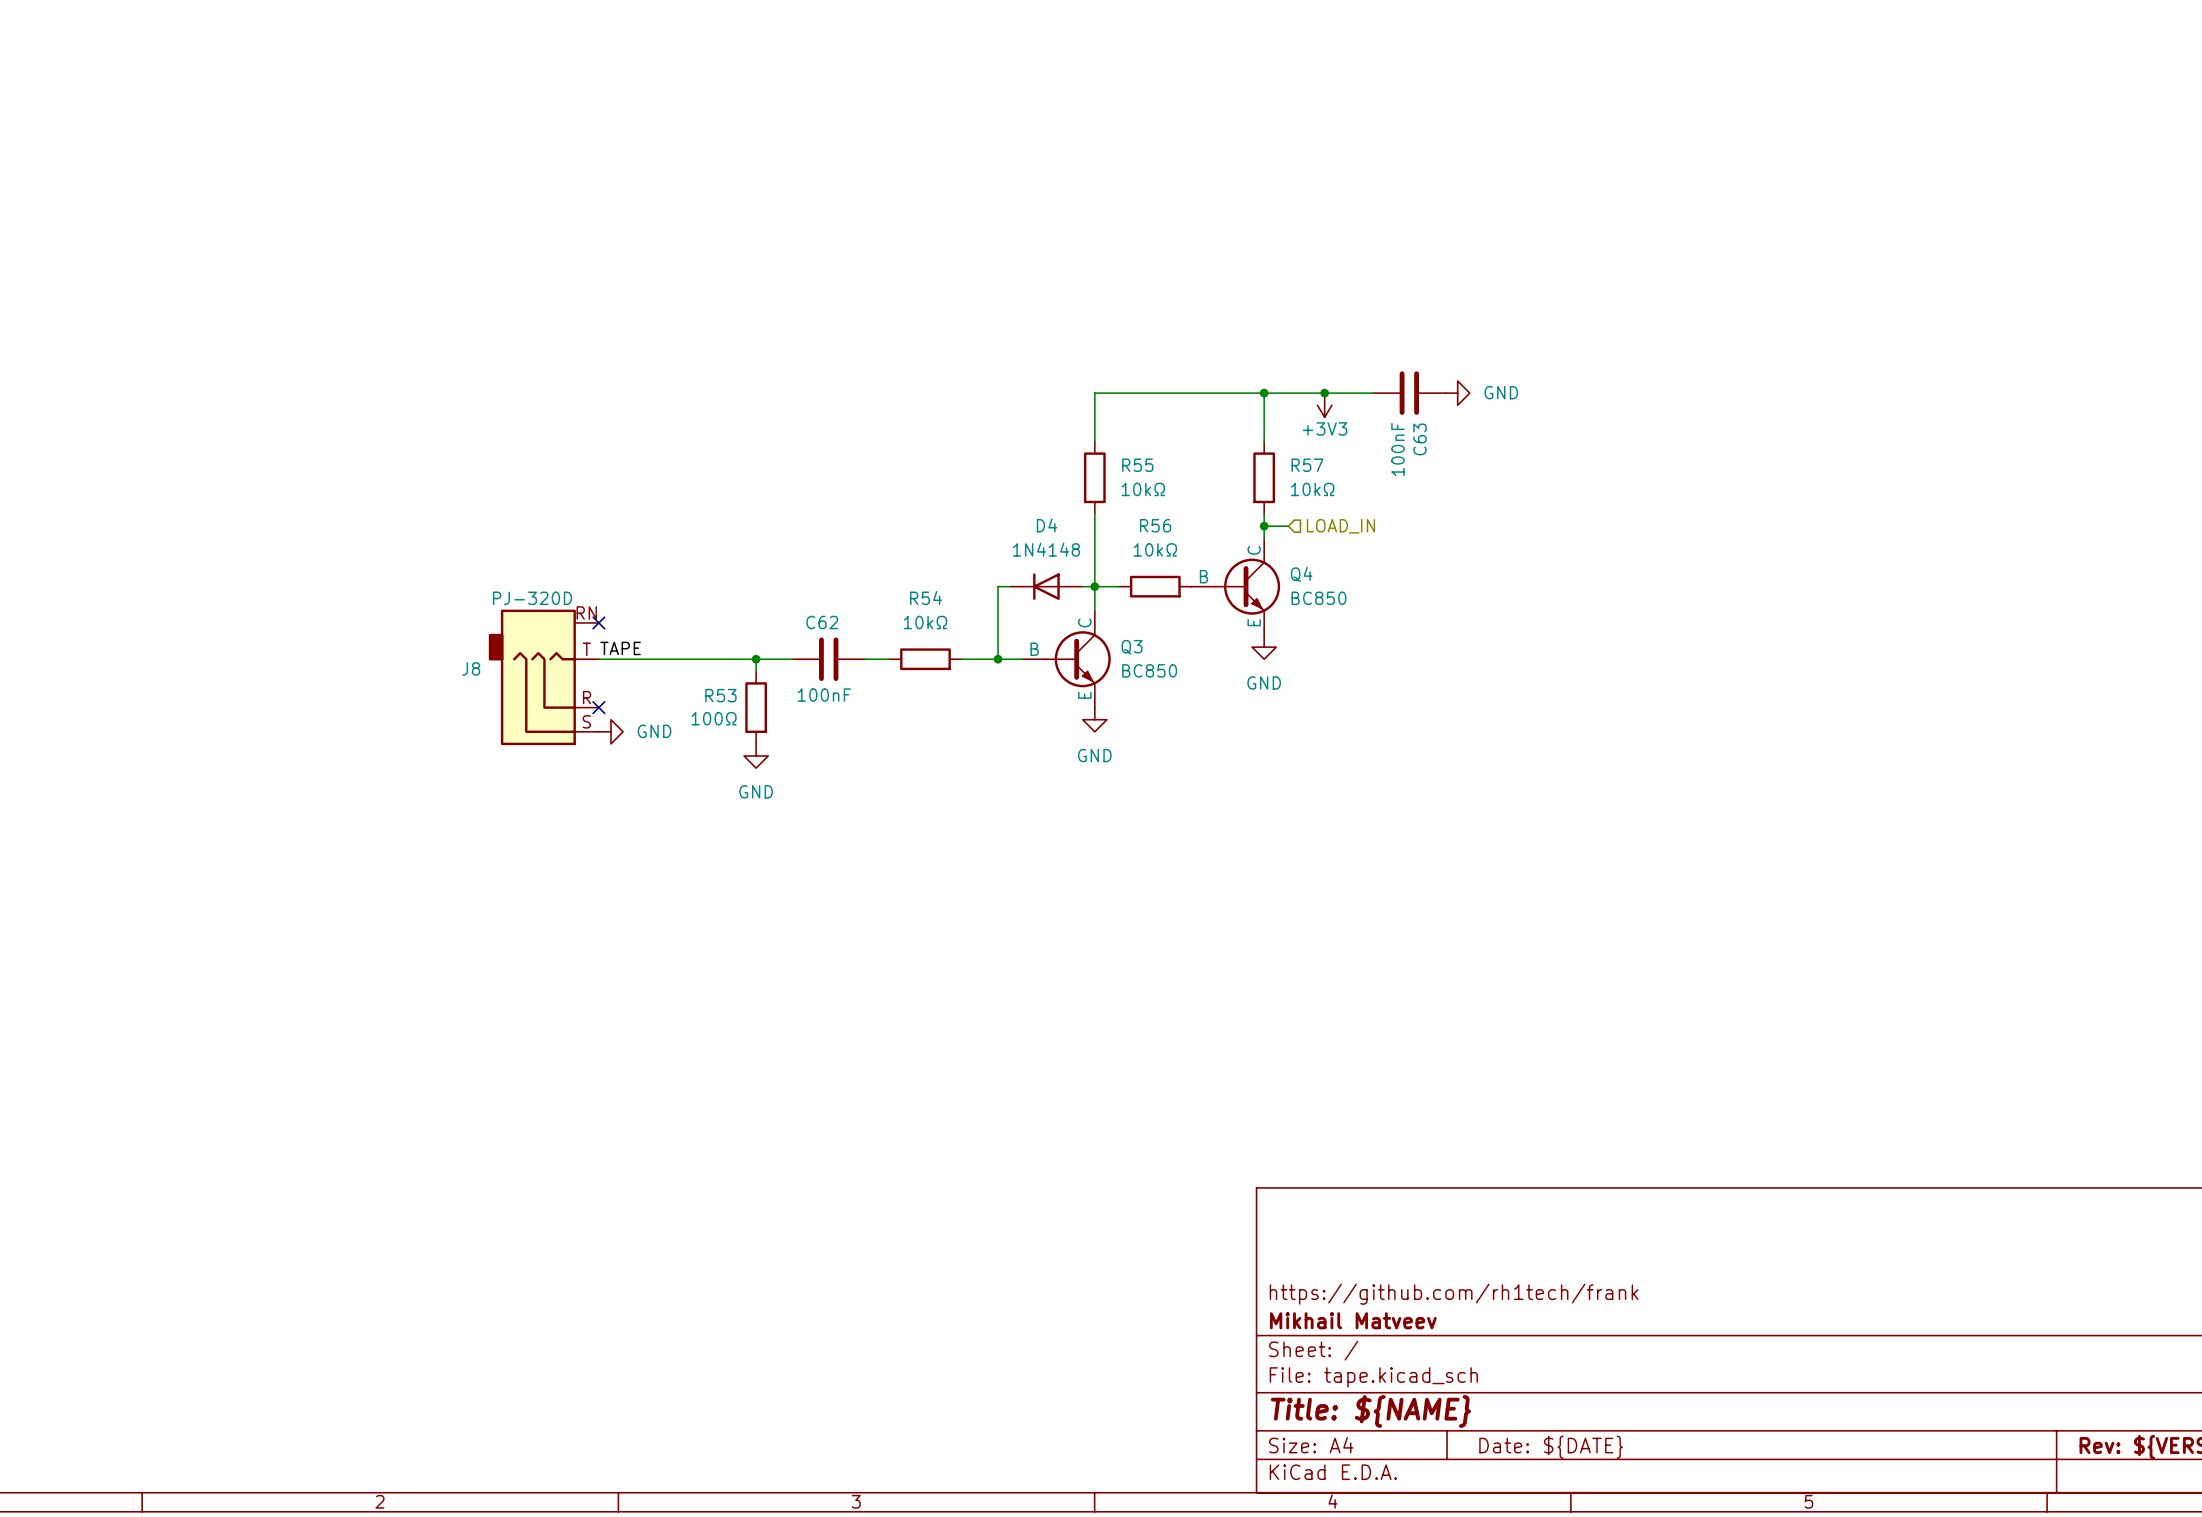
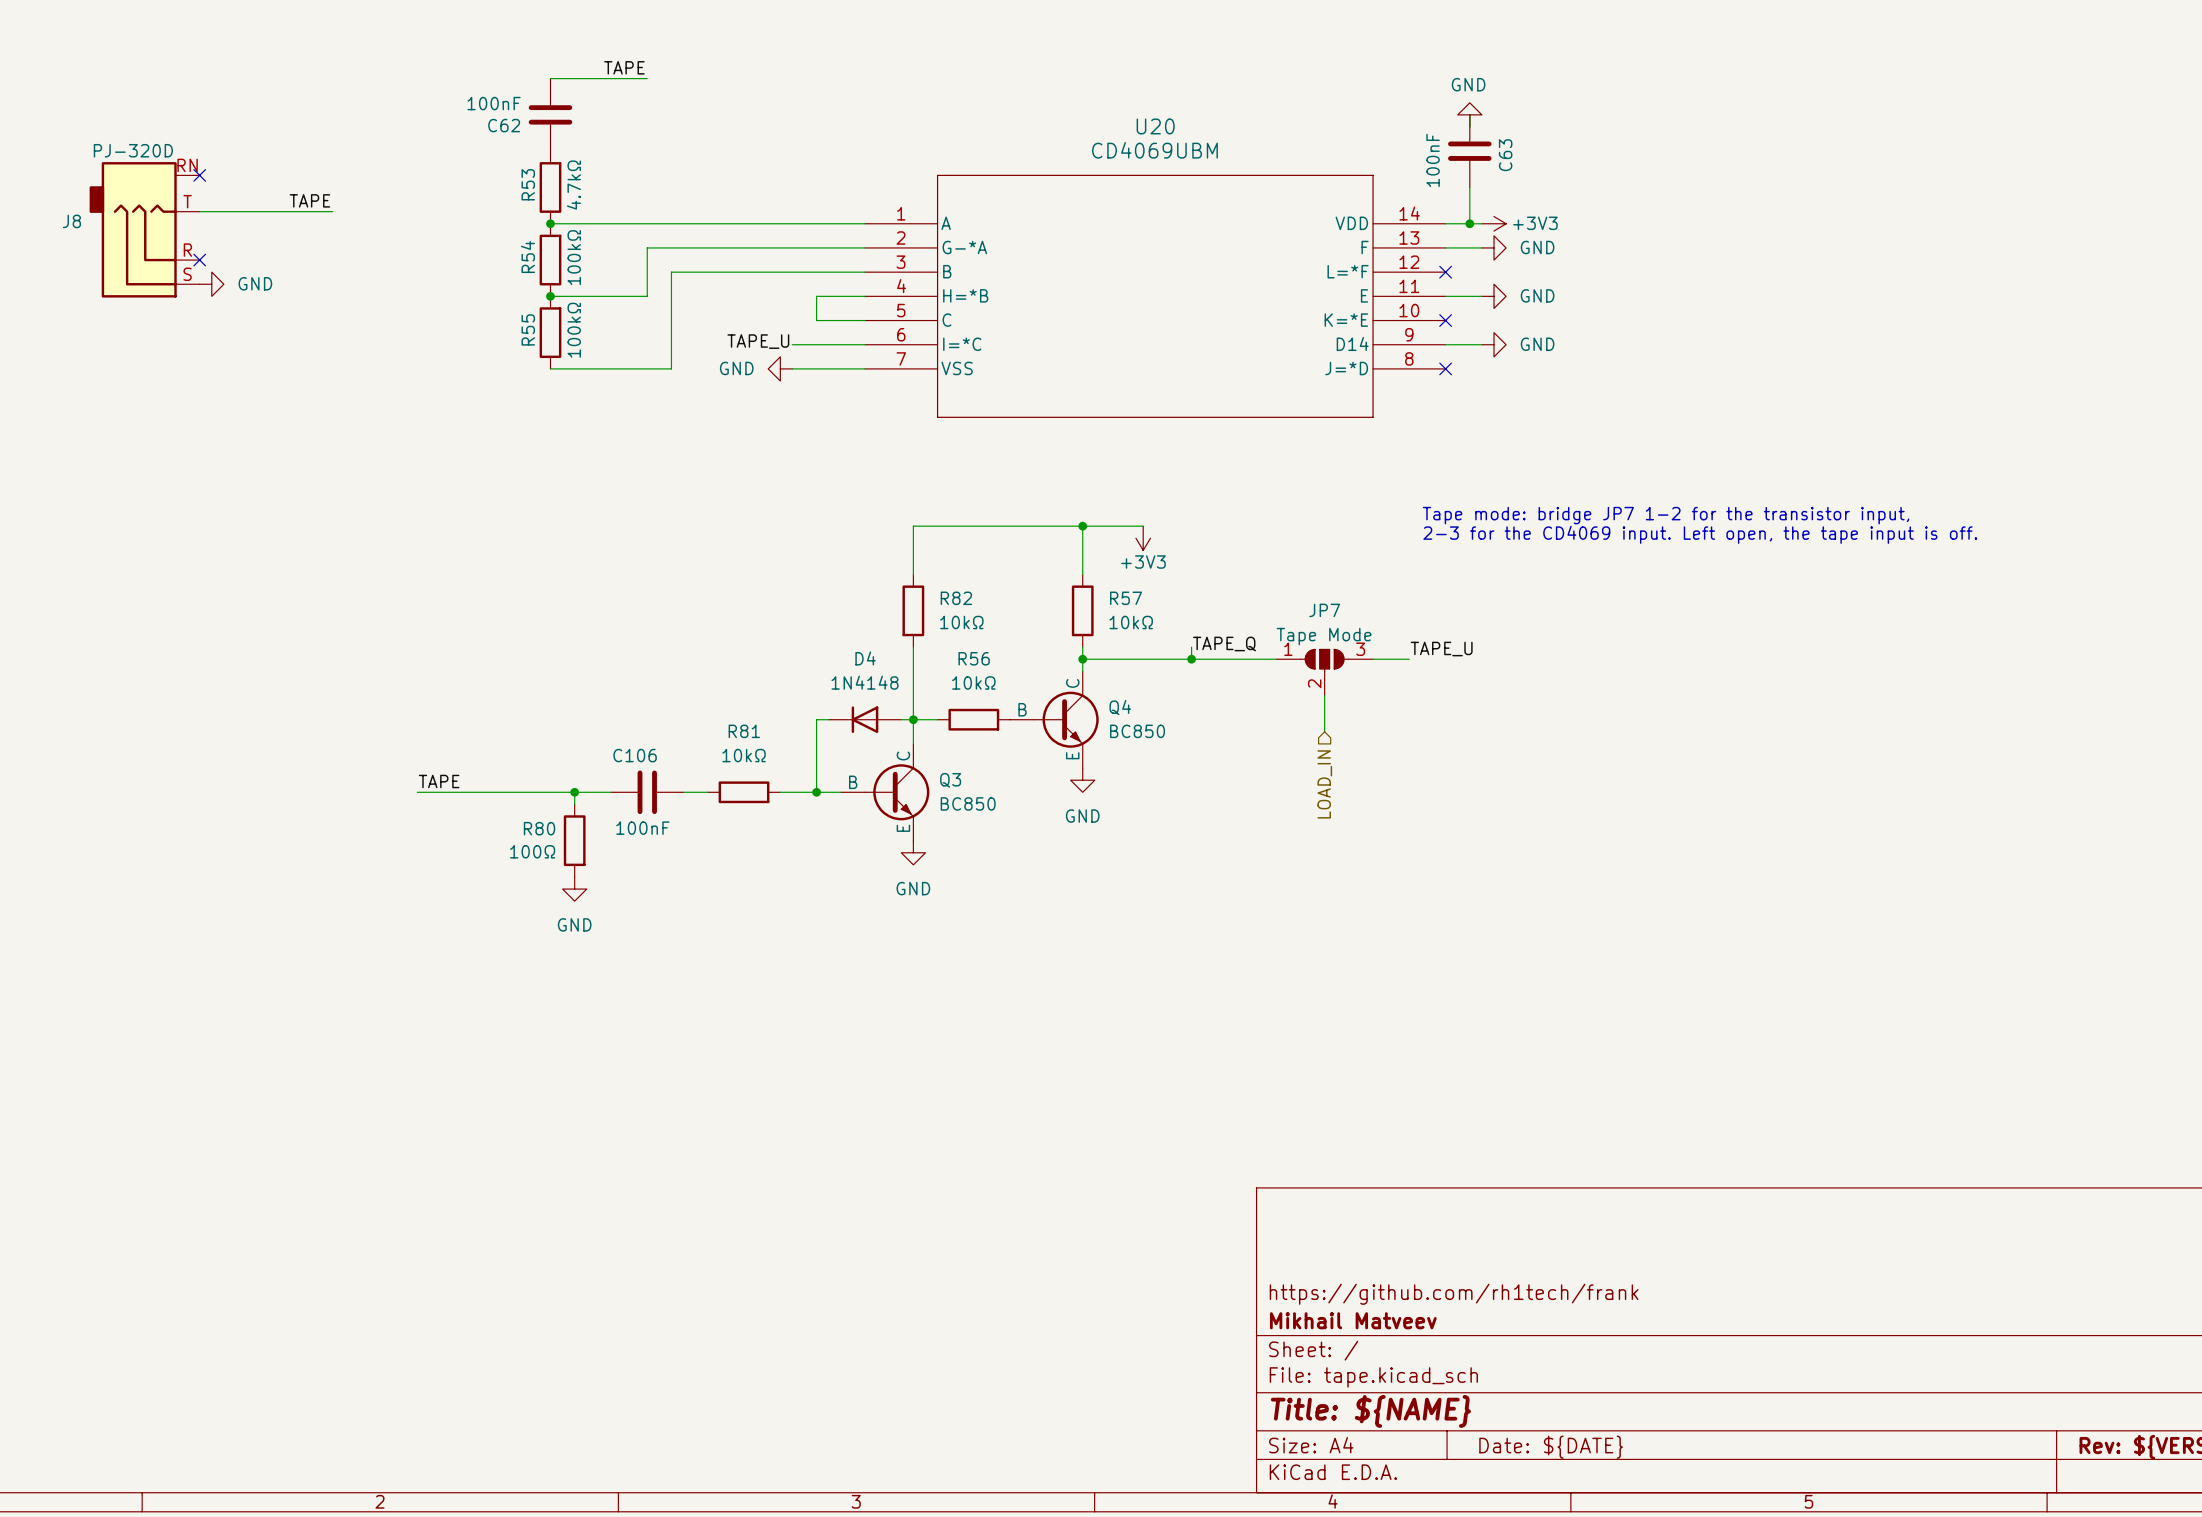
label: none -> TAPE (624, 67)
wire: none -> (550, 78) (647, 78)
wire: none -> (1469, 114) (1469, 127)
power symbol: none -> GND (1469, 114)
no-connect mark: none -> (199, 175)
wire: none -> (1469, 187) (1469, 223)
label: none -> TAPE (309, 200)
wire: none -> (199, 211) (332, 211)
wire: none -> (550, 223) (864, 223)
junction: none -> (550, 223)
wire: none -> (1445, 223) (1481, 223)
junction: none -> (1469, 223)
power symbol: none -> +3V3 (1494, 223)
wire: none -> (864, 247) (647, 247) (647, 296) (550, 296)
wire: none -> (1445, 247) (1481, 247)
power symbol: none -> GND (1494, 247)
no-connect mark: none -> (199, 260)
wire: none -> (864, 272) (671, 272) (671, 368) (550, 368)
no-connect mark: none -> (1445, 272)
power symbol: none -> GND (211, 284)
junction: none -> (550, 296)
wire: none -> (864, 296) (816, 296) (816, 320) (864, 320)
U20: none -> CD4069UBM (1155, 296)
wire: none -> (1445, 296) (1481, 296)
power symbol: none -> GND (1494, 296)
no-connect mark: none -> (1445, 320)
label: none -> TAPE_U (758, 341)
wire: none -> (792, 344) (864, 344)
wire: none -> (1445, 344) (1481, 344)
power symbol: none -> GND (1494, 344)
power symbol: none -> GND (780, 368)
wire: none -> (792, 368) (864, 368)
no-connect mark: none -> (1445, 368)
wire: (1264, 393) (1264, 441) -> (1082, 526) (1082, 574)
junction: (1264, 393) -> none
junction: (1324, 393) -> none
wire: (1373, 393) (1094, 393) (1094, 441) -> none
C63 rotation: 0° (1409, 393) -> 90° clockwise (1469, 151)
C63 position: (1409, 393) -> (1469, 151)
power symbol: GND (1457, 393) -> none
power symbol: +3V3 (1324, 405) -> none
C63 name position: C63 (1420, 439) -> C63 (1505, 155)
C63 value position: 100nF (1397, 449) -> 100nF (1433, 160)
R55 name rotation: 0° (1137, 465) -> 90° counterclockwise (528, 329)
R55 name position: R55 (1137, 465) -> R55 (528, 329)
R55 position: (1094, 477) -> (550, 332)
R57 position: (1264, 477) -> (1082, 610)
R55 value: 10kΩ (1143, 489) -> 100kΩ (574, 330)
wire: (1094, 514) (1094, 610) -> (913, 647) (913, 743)
wire: (1264, 514) (1264, 538) -> (1082, 647) (1082, 671)
text: none -> Tape mode: bridge JP7 1-2 for the transistor input, (1666, 515)
junction: none -> (1082, 526)
wire: none -> (1143, 526) (913, 526) (913, 574)
wire: (1264, 526) (1288, 526) -> none
junction: (1264, 526) -> none
hierarchical label rotation: 0° (1340, 526) -> 90° clockwise (1324, 784)
hierarchical label position: LOAD_IN (1340, 526) -> LOAD_IN (1324, 784)
text: none -> 2-3 for the CD4069 input. Left open, the tape input is off. (1700, 534)
power symbol: none -> +3V3 (1143, 538)
wire: (1010, 586) (998, 586) (998, 659) -> (828, 719) (816, 719) (816, 792)
D4 position: (1046, 586) -> (864, 719)
wire: (1082, 586) (1119, 586) -> (901, 719) (937, 719)
junction: (1094, 586) -> none
R56 position: (1155, 586) -> (973, 719)
Q4 position: (1235, 586) -> (1054, 719)
R54 name position: R54 (926, 598) -> R54 (527, 257)
R82: none -> 10kΩ (913, 610)
no-connect mark: (598, 622) -> none
C62 name position: C62 (822, 622) -> C62 (504, 125)
R54 value: 10kΩ (925, 622) -> 100kΩ (574, 257)
label: none -> TAPE_Q (1224, 644)
wire: none -> (1191, 647) (1191, 659)
power symbol: GND (1264, 647) -> none
label position: TAPE (620, 648) -> TAPE (439, 781)
label: none -> TAPE_U (1441, 649)
wire: (598, 659) (792, 659) -> (417, 792) (610, 792)
wire: (756, 659) (756, 671) -> (574, 792) (574, 804)
junction: (756, 659) -> none
C62 rotation: 0° (828, 659) -> 90° clockwise (550, 114)
C62 position: (828, 659) -> (550, 114)
wire: (864, 659) (889, 659) -> (683, 792) (707, 792)
R54 rotation: 0° (925, 659) -> 90° clockwise (550, 260)
R54 position: (925, 659) -> (550, 260)
wire: (961, 659) (1022, 659) -> (780, 792) (840, 792)
junction: (998, 659) -> none
Q3 position: (1066, 659) -> (885, 792)
wire: none -> (1082, 659) (1276, 659)
junction: none -> (1082, 659)
junction: none -> (1191, 659)
wire: none -> (1373, 659) (1409, 659)
JP7: none -> Tape Mode (1324, 672)
J8 position: (543, 677) -> (144, 229)
R53 name rotation: 0° (720, 695) -> 90° counterclockwise (528, 184)
C62 value position: 100nF (824, 695) -> 100nF (494, 103)
wire: none -> (1324, 695) (1324, 731)
no-connect mark: (598, 707) -> none
R53 position: (756, 707) -> (550, 187)
R53 value: 100Ω (714, 718) -> 4.7kΩ (573, 185)
junction: none -> (913, 719)
power symbol position: GND (1094, 719) -> GND (1082, 780)
power symbol: GND (610, 731) -> none
power symbol: GND (756, 756) -> none
junction: none -> (574, 792)
C106: none -> 100nF (647, 792)
R81: none -> 10kΩ (744, 792)
junction: none -> (816, 792)
R80: none -> 100Ω (574, 840)
power symbol: none -> GND (913, 852)
power symbol: none -> GND (574, 889)

